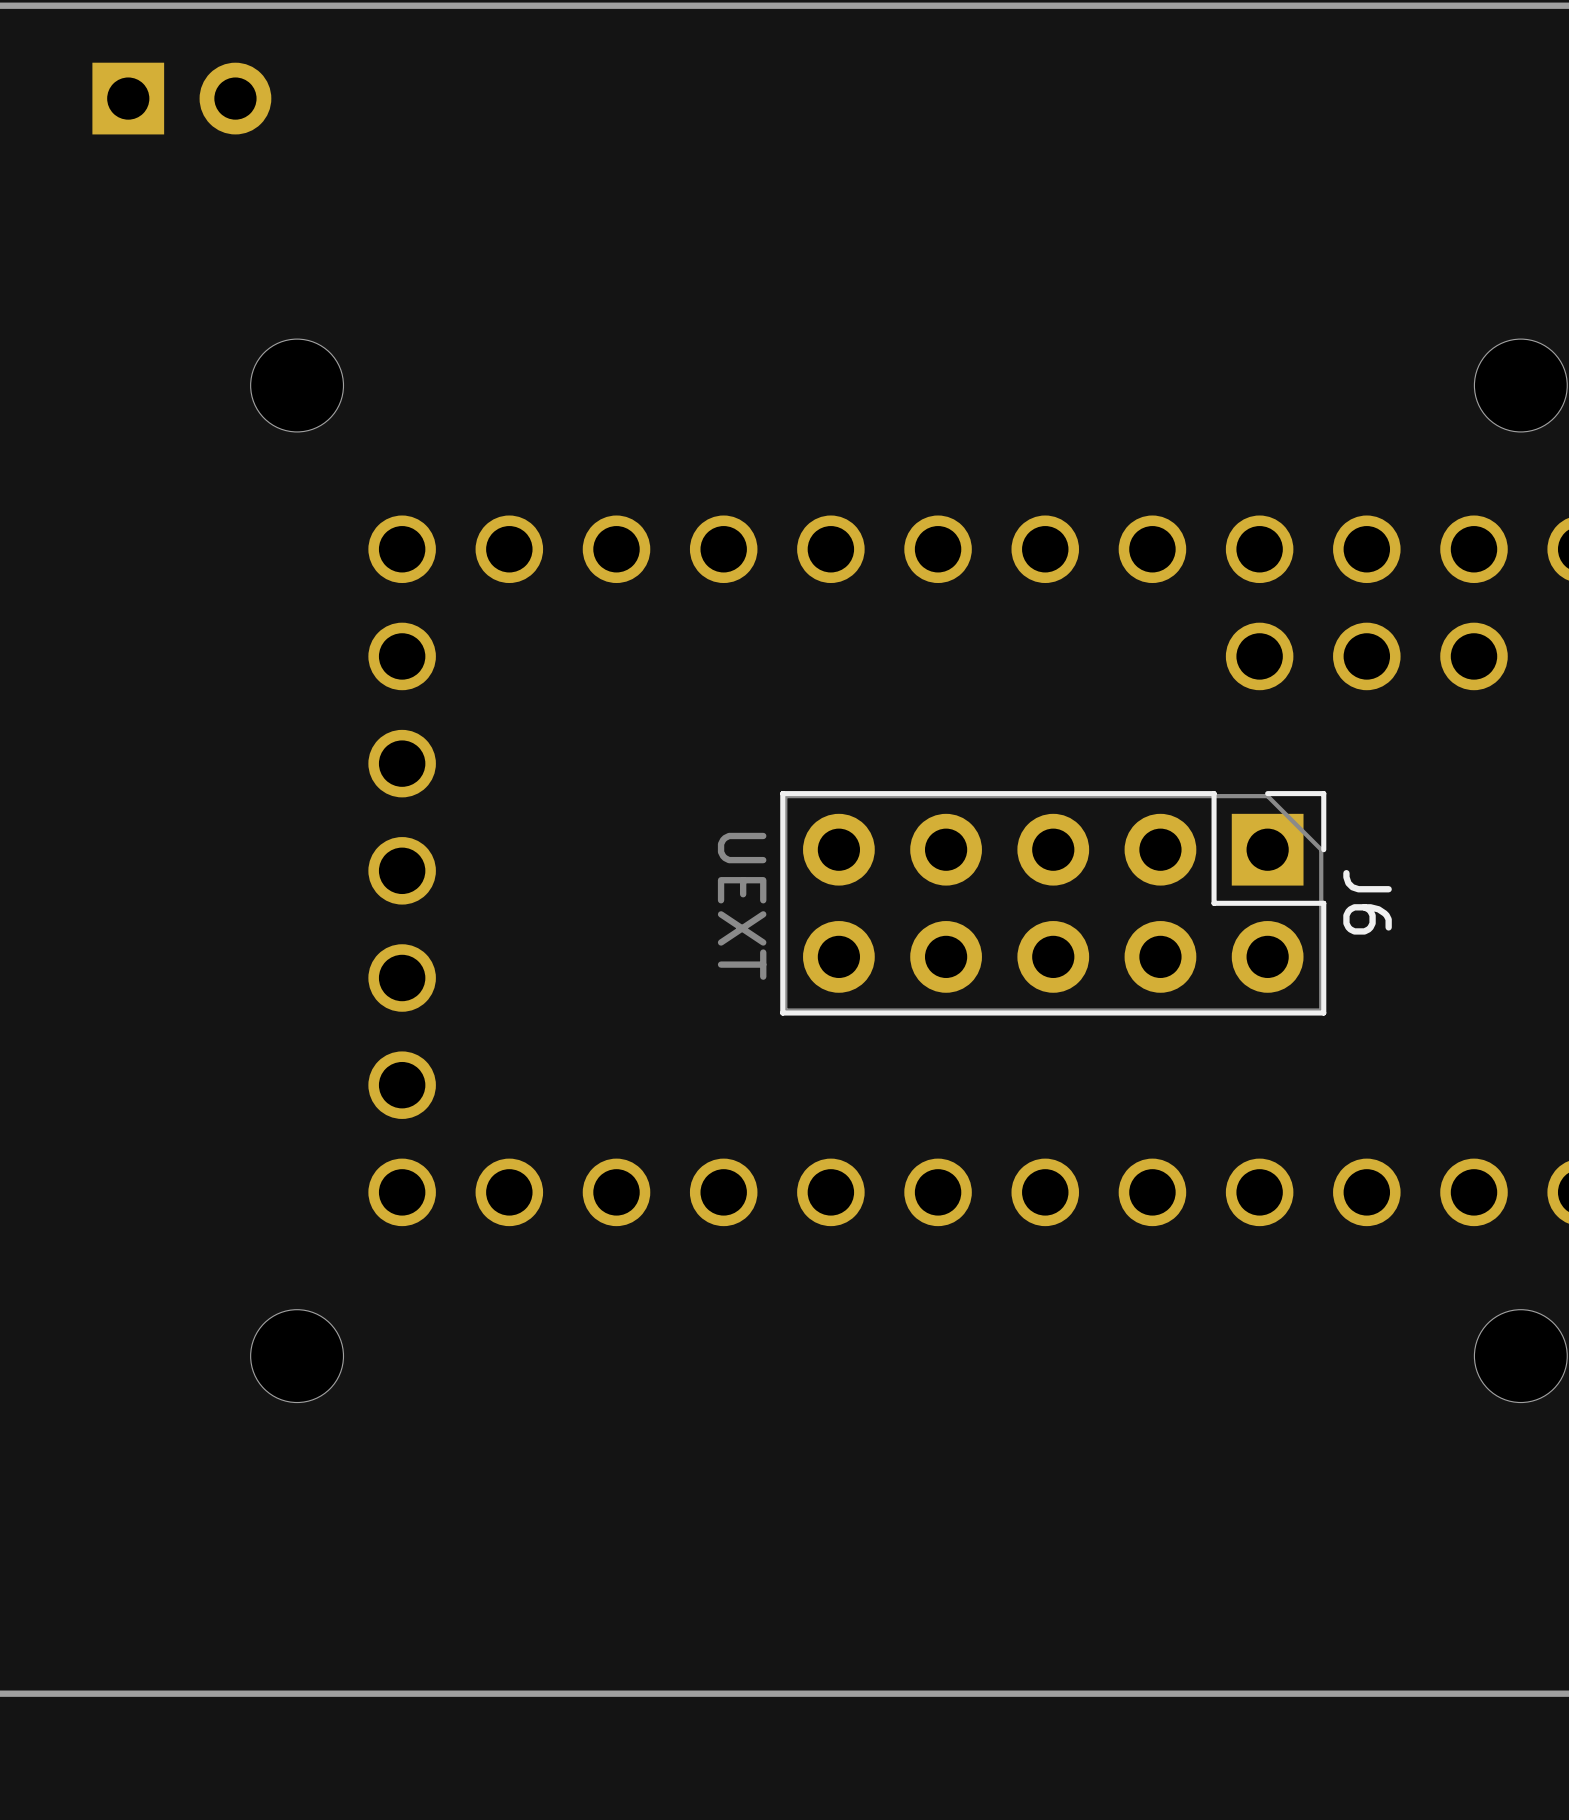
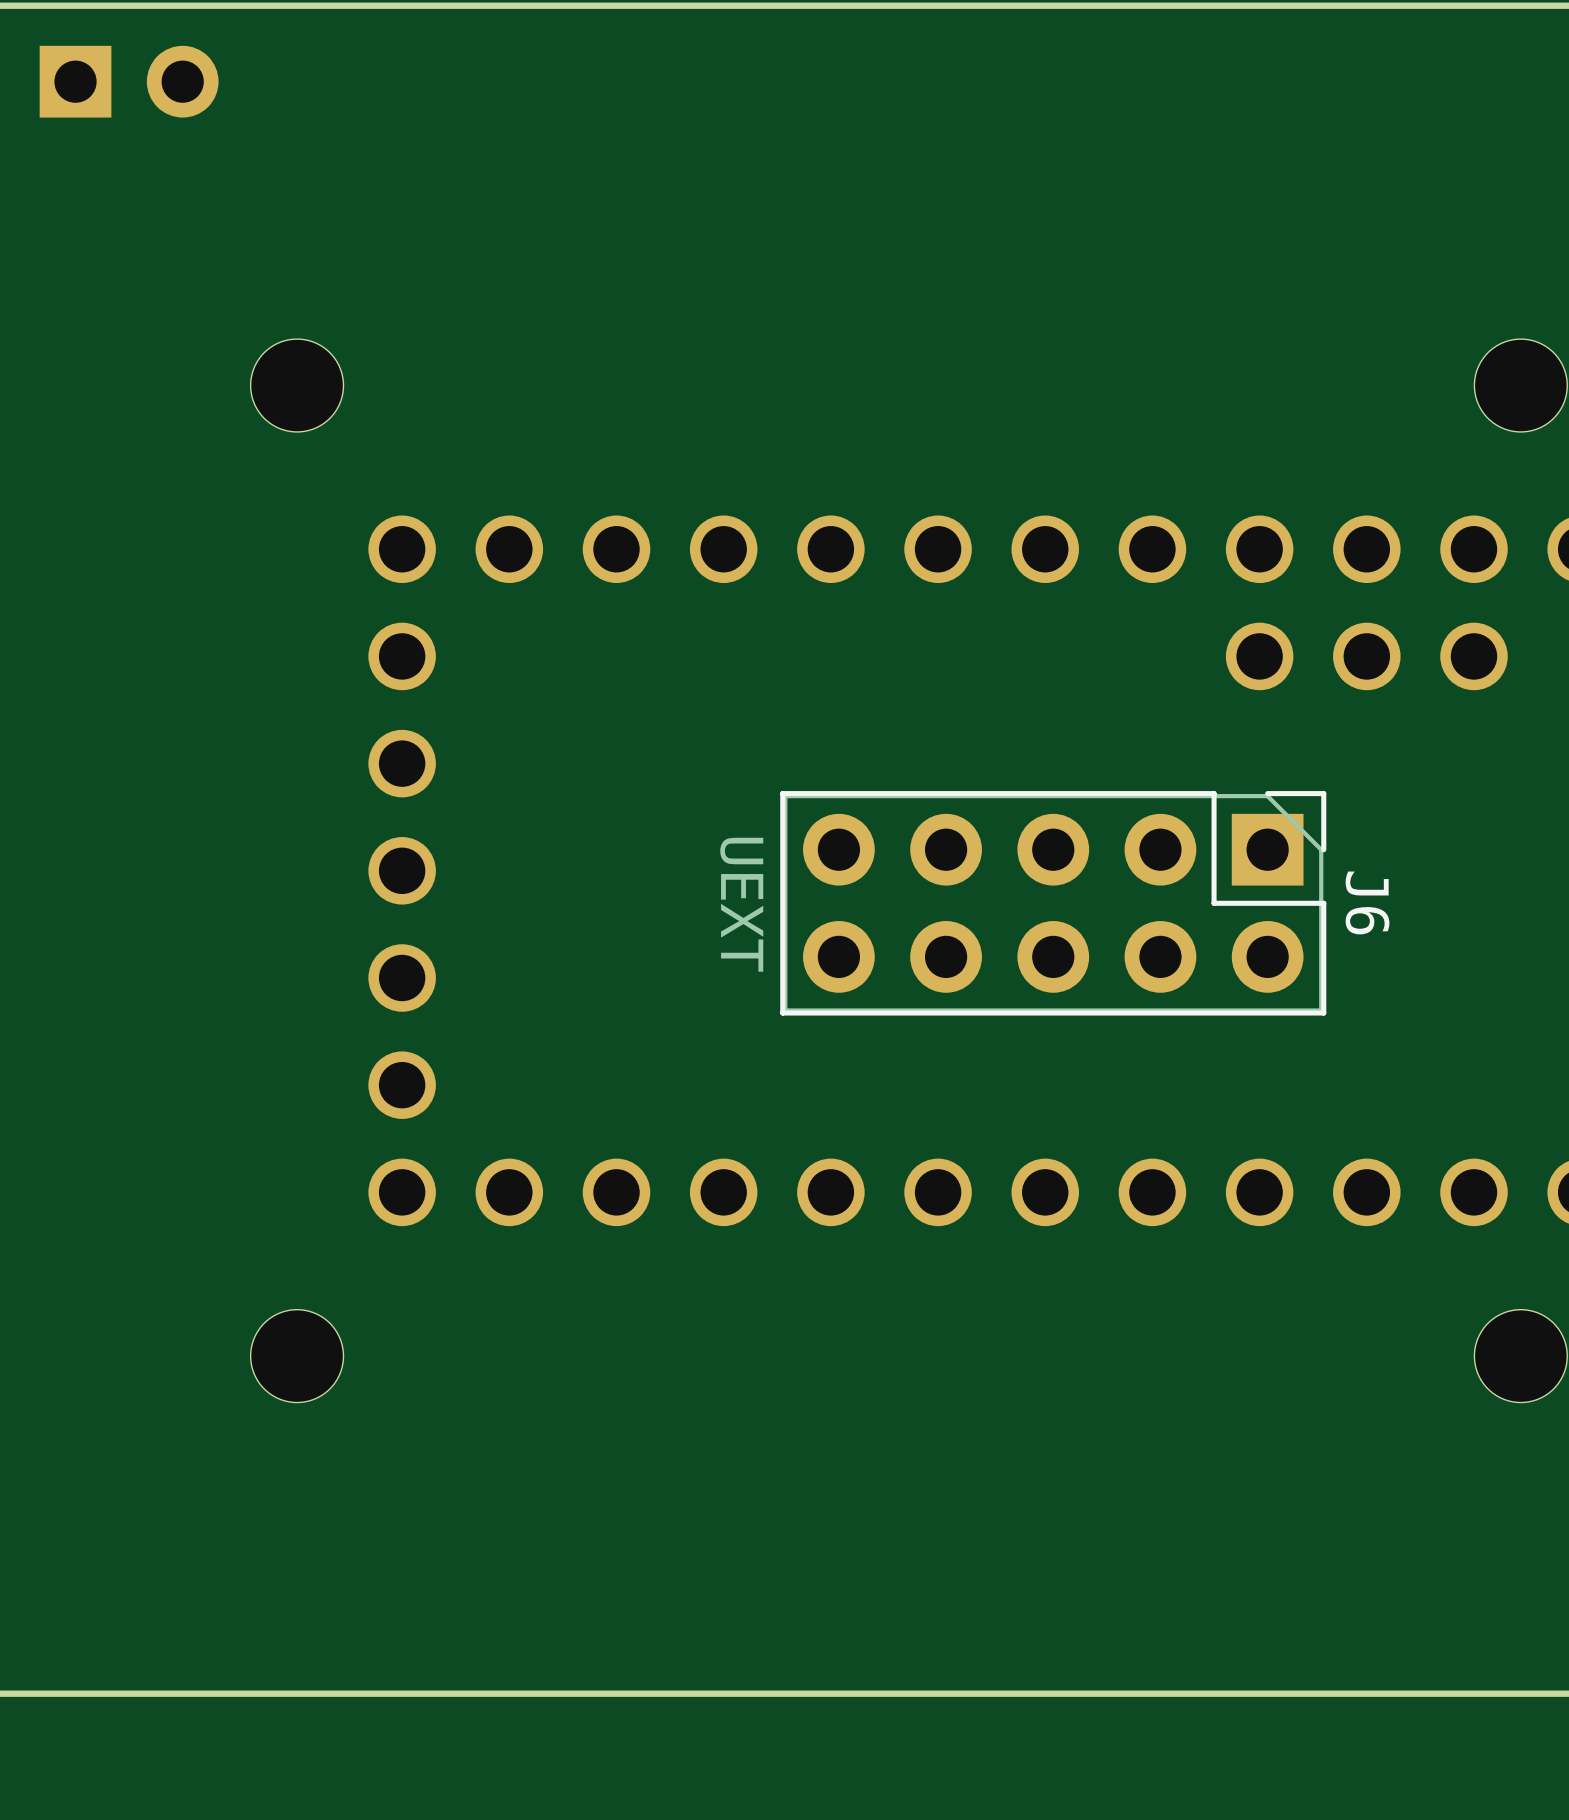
part position: (181, 98) -> (129, 81)

